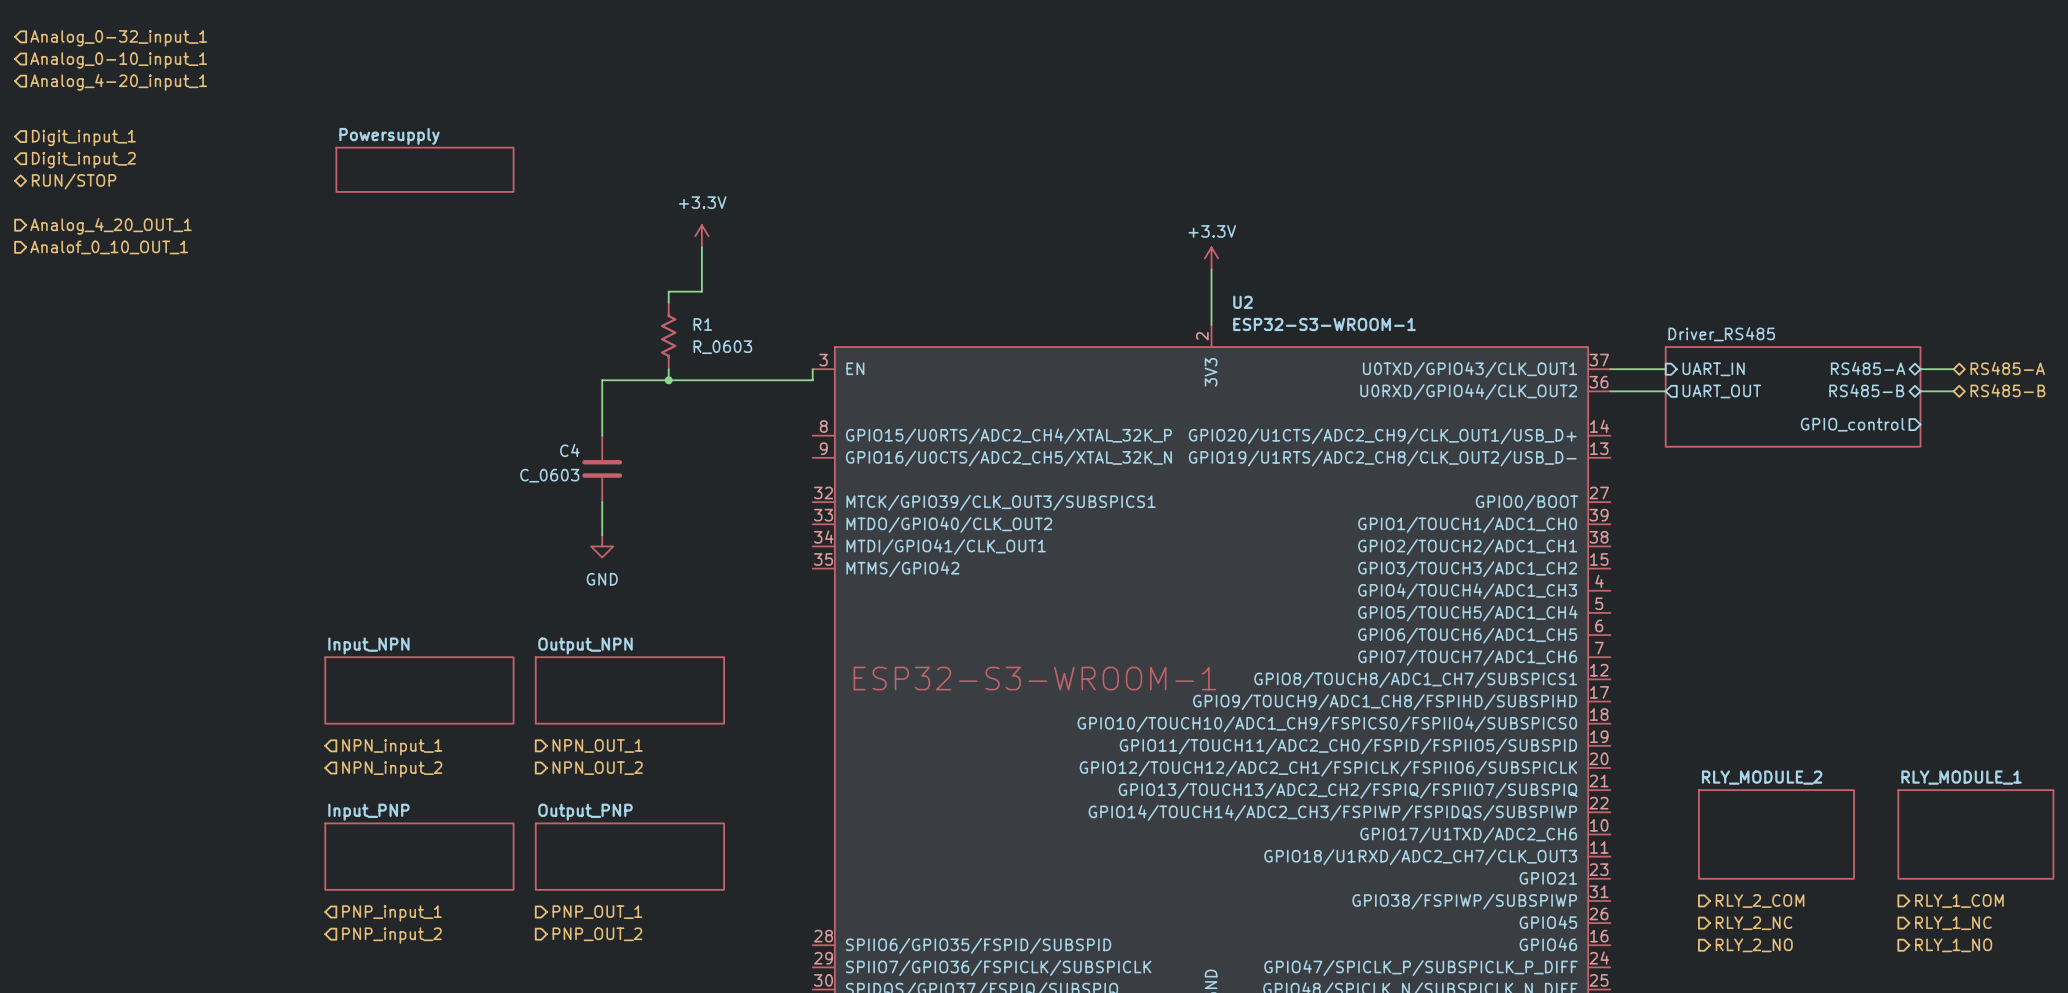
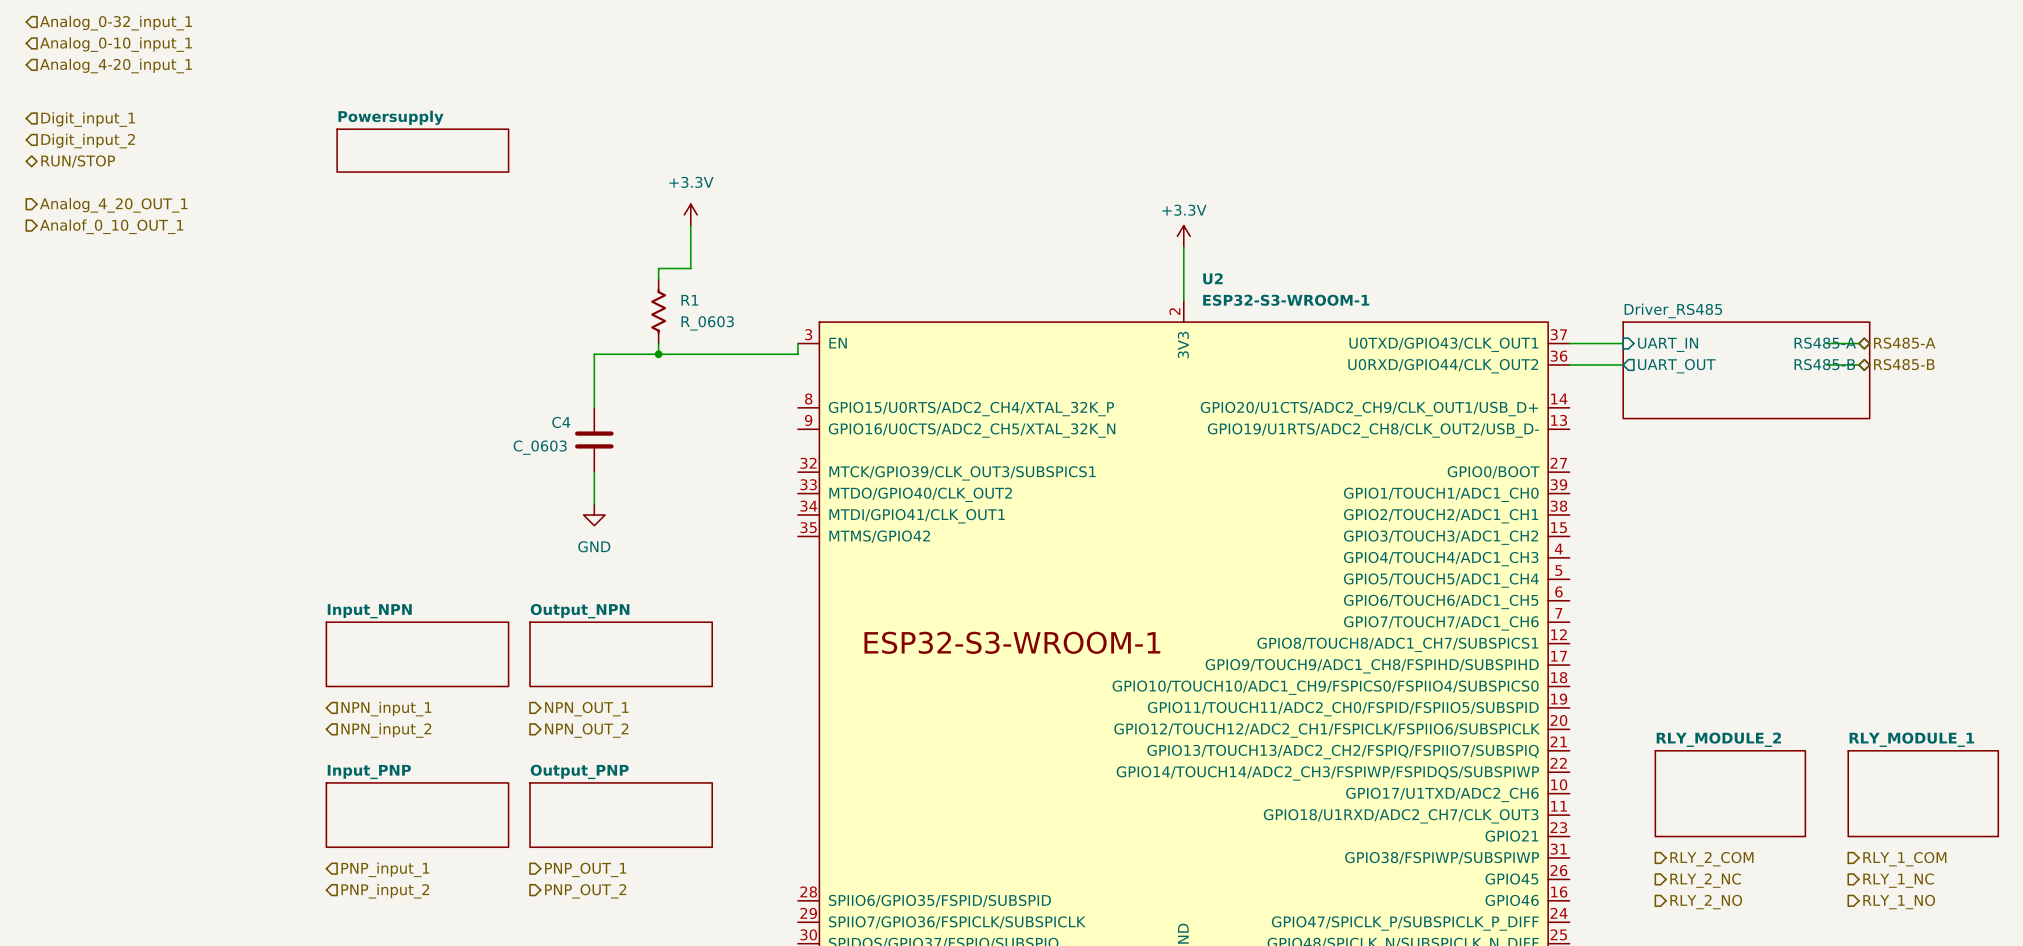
hierarchical label position: RS485-A (2007, 368) -> RS485-A (1904, 343)
wire: (1920, 369) (1953, 369) -> (1826, 343) (1858, 343)
hierarchical label position: RS485-B (2007, 390) -> RS485-B (1904, 364)
wire: (1920, 391) (1953, 391) -> (1826, 364) (1858, 364)
sheet pin: GPIO_control (1852, 424) -> none

